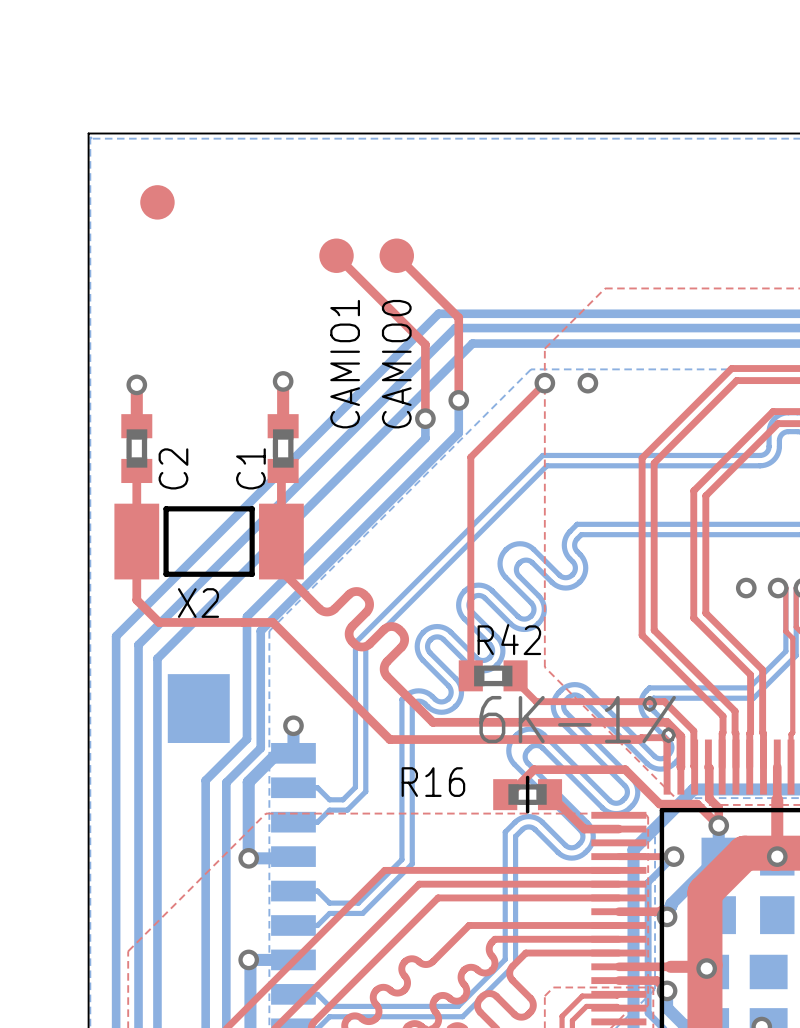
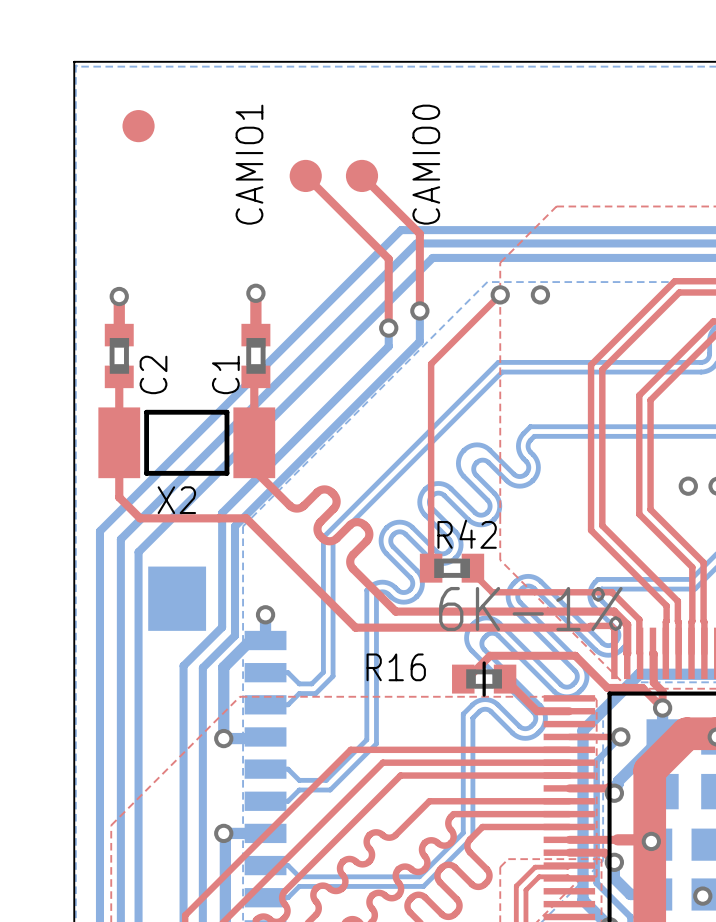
CAMIO1 name position: CAMIO1 (345, 364) -> CAMIO1 (249, 164)
CAMIO0 name position: CAMIO0 (396, 364) -> CAMIO0 (426, 164)

